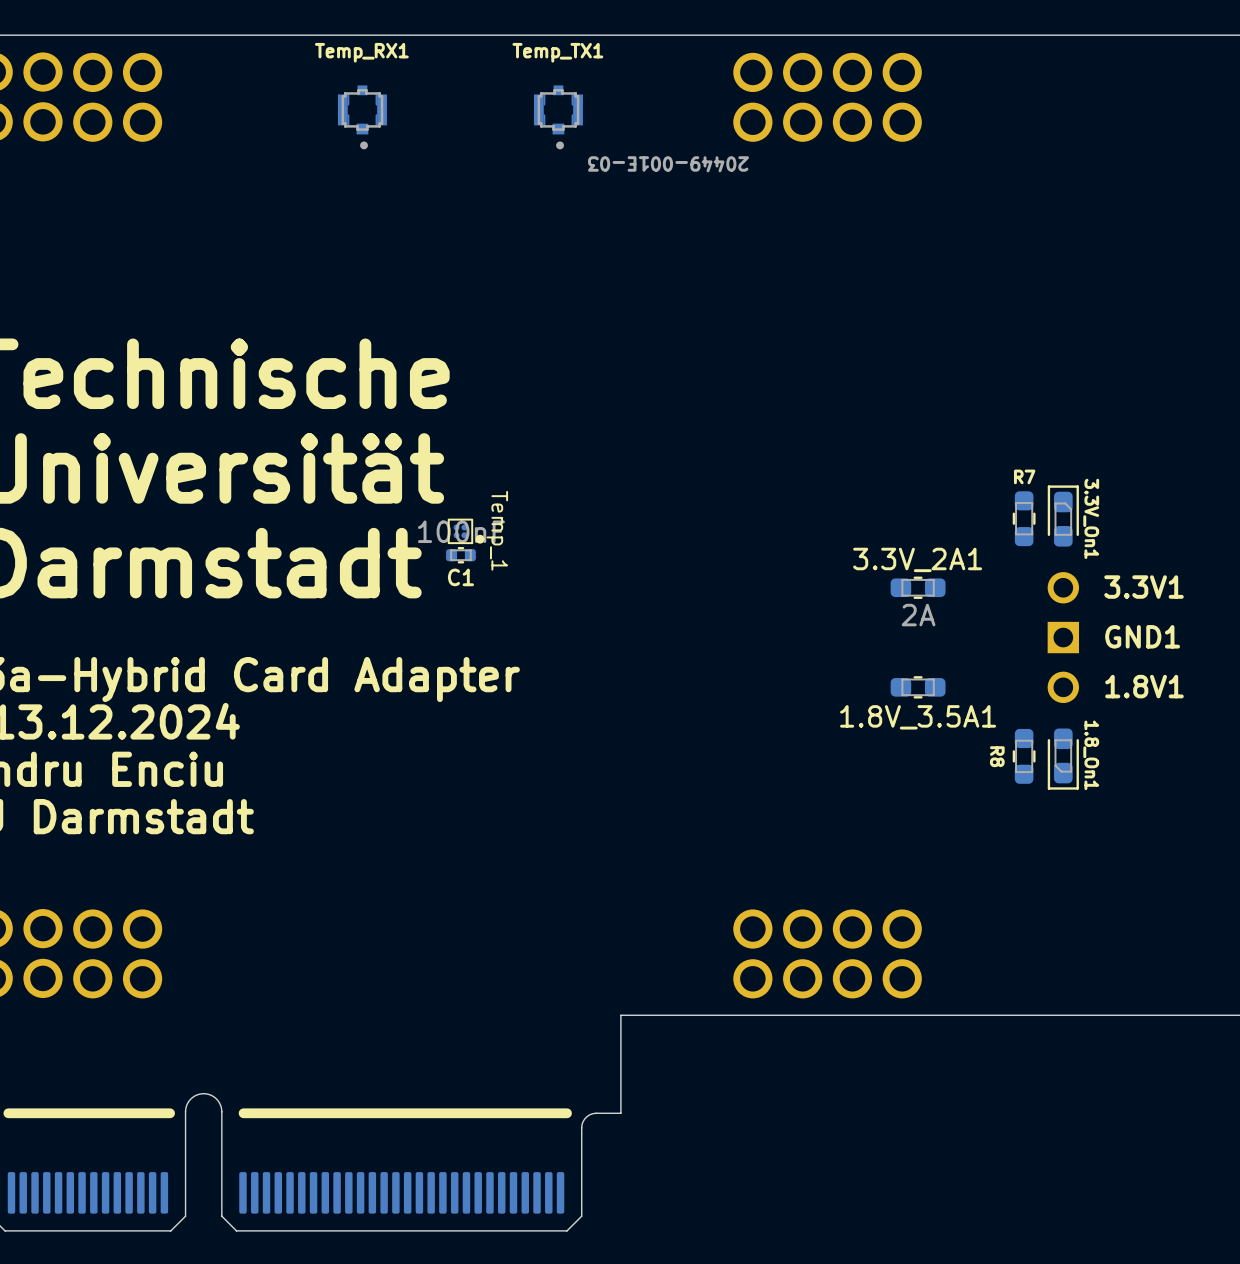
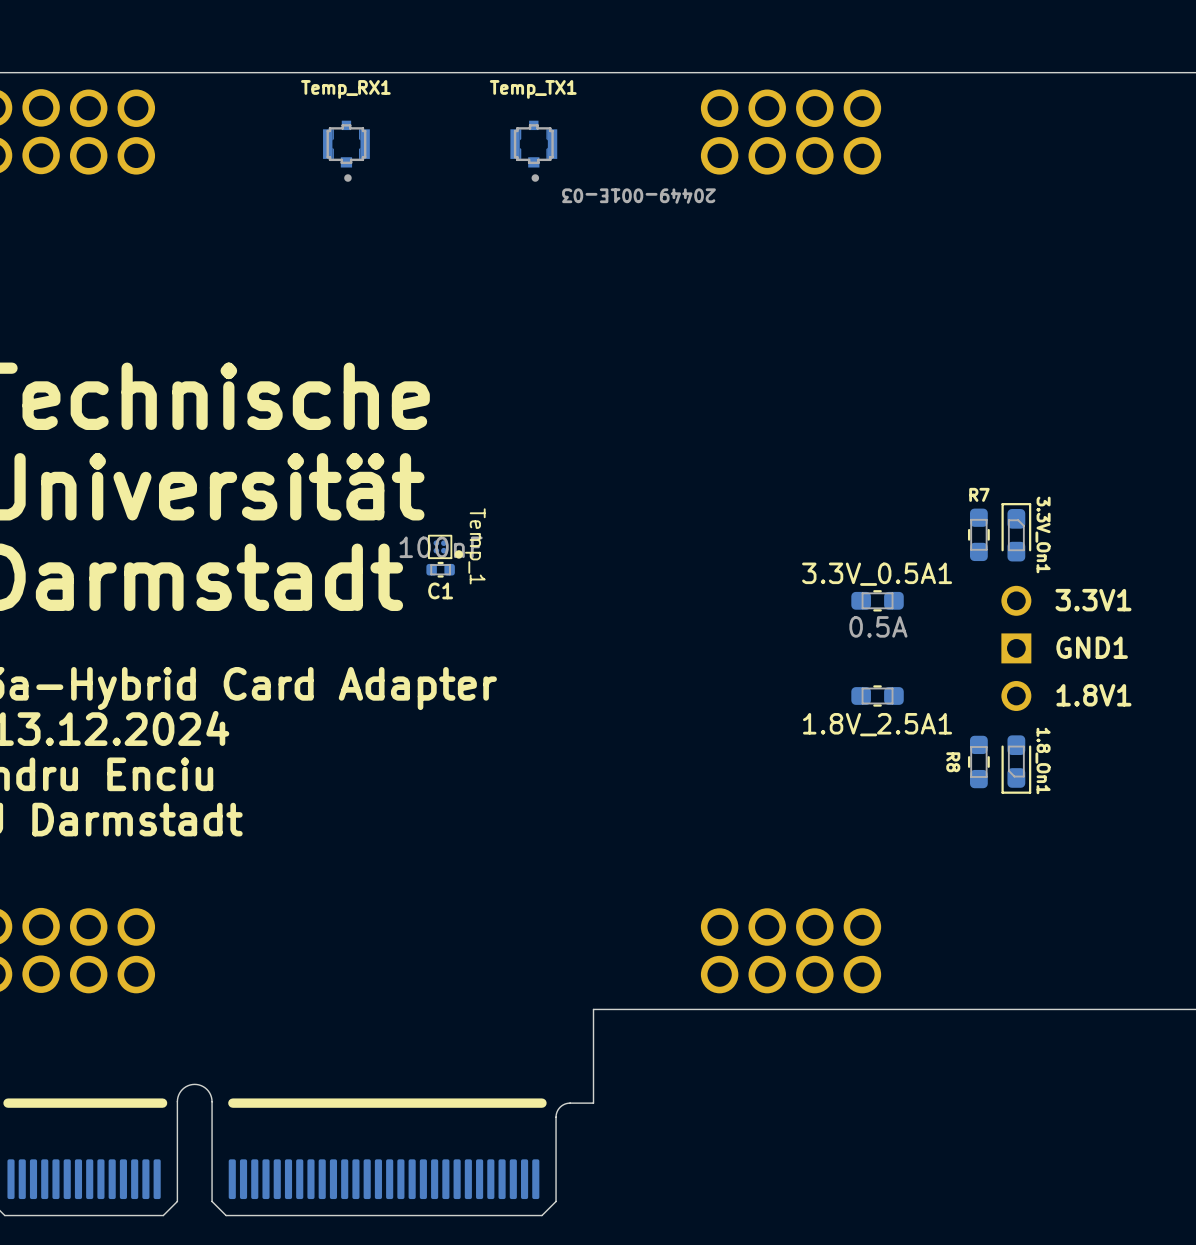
3.3V_2A1 name: 3.3V_2A1 (917, 559) -> 3.3V_0.5A1 (877, 574)
3.3V_2A1 value: 2A (918, 615) -> 0.5A (878, 626)
1.8V_3.5A1 name: 1.8V_3.5A1 (918, 717) -> 1.8V_2.5A1 (877, 724)

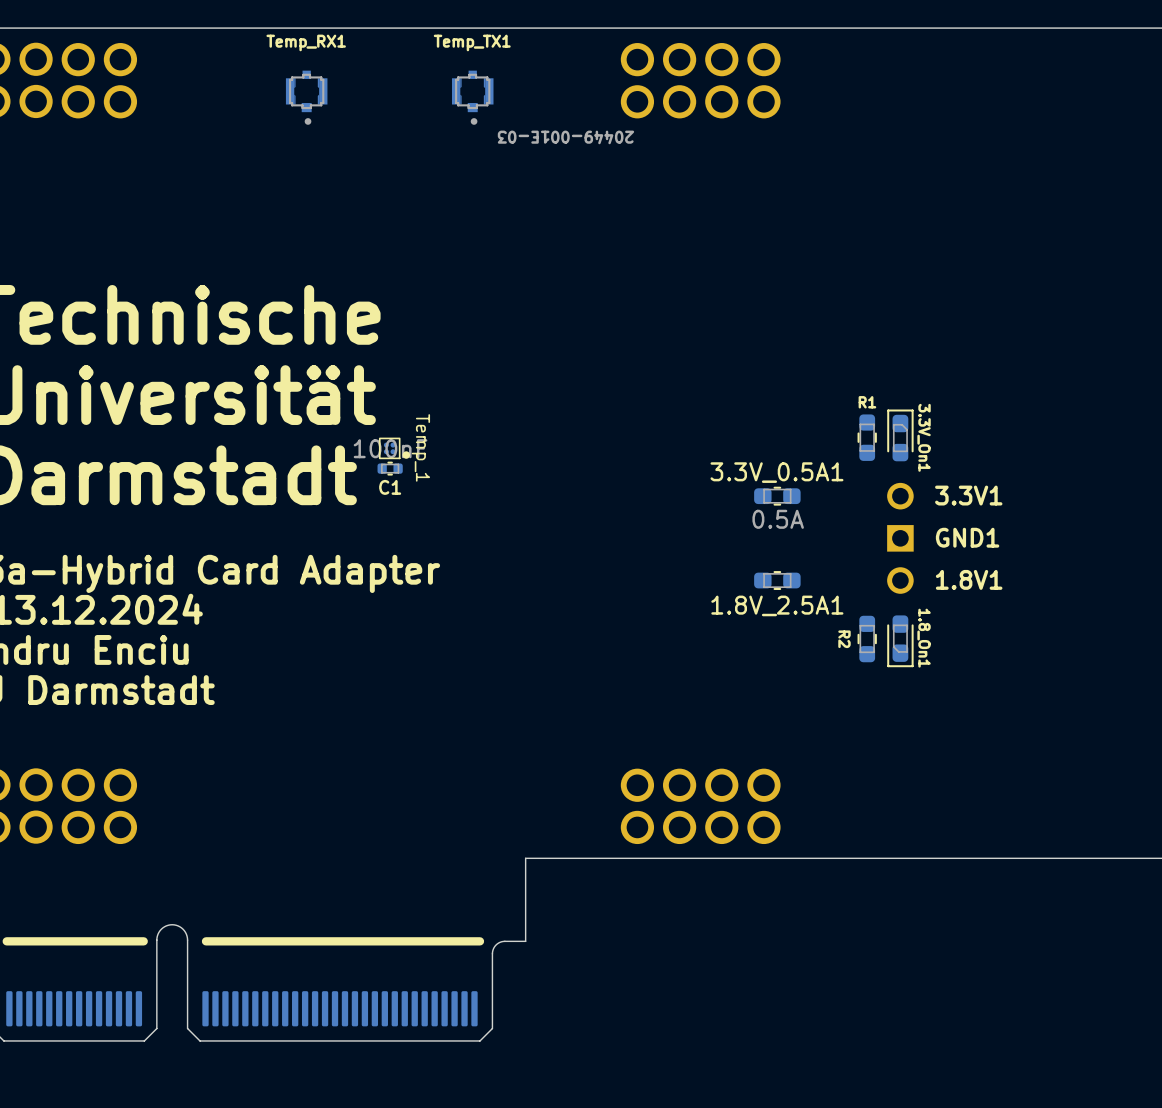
R7 name: R7 (979, 494) -> R1 (867, 402)
R8 name: R8 (953, 762) -> R2 (844, 639)

